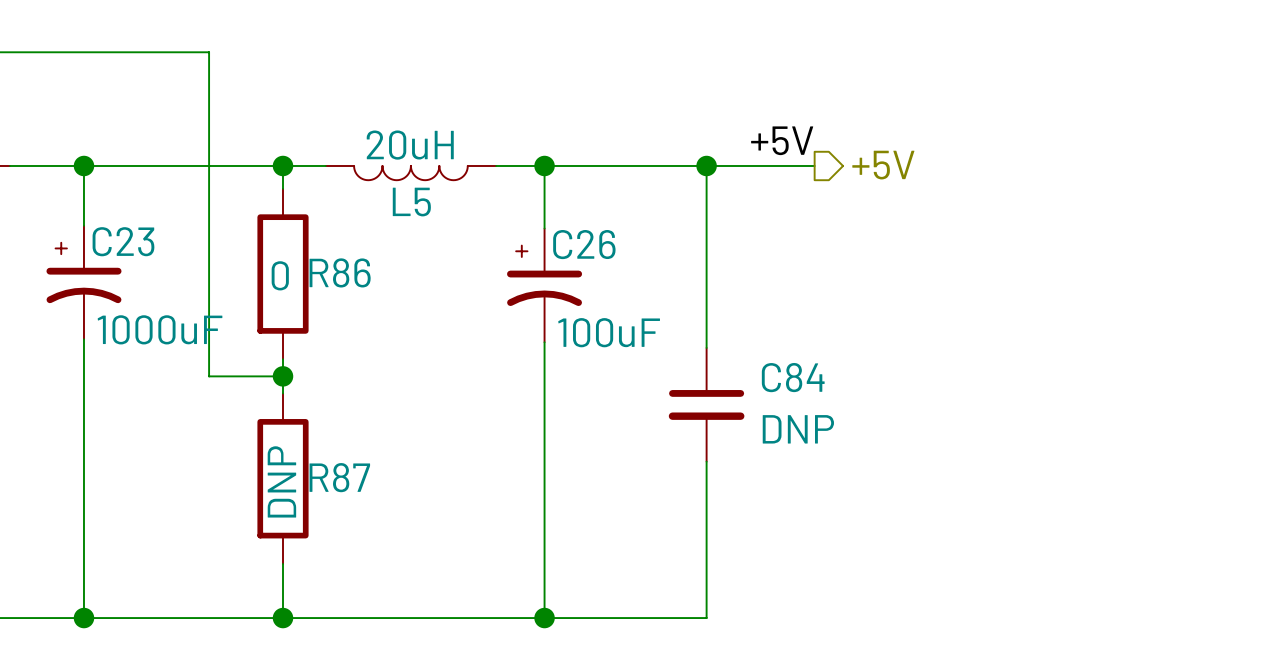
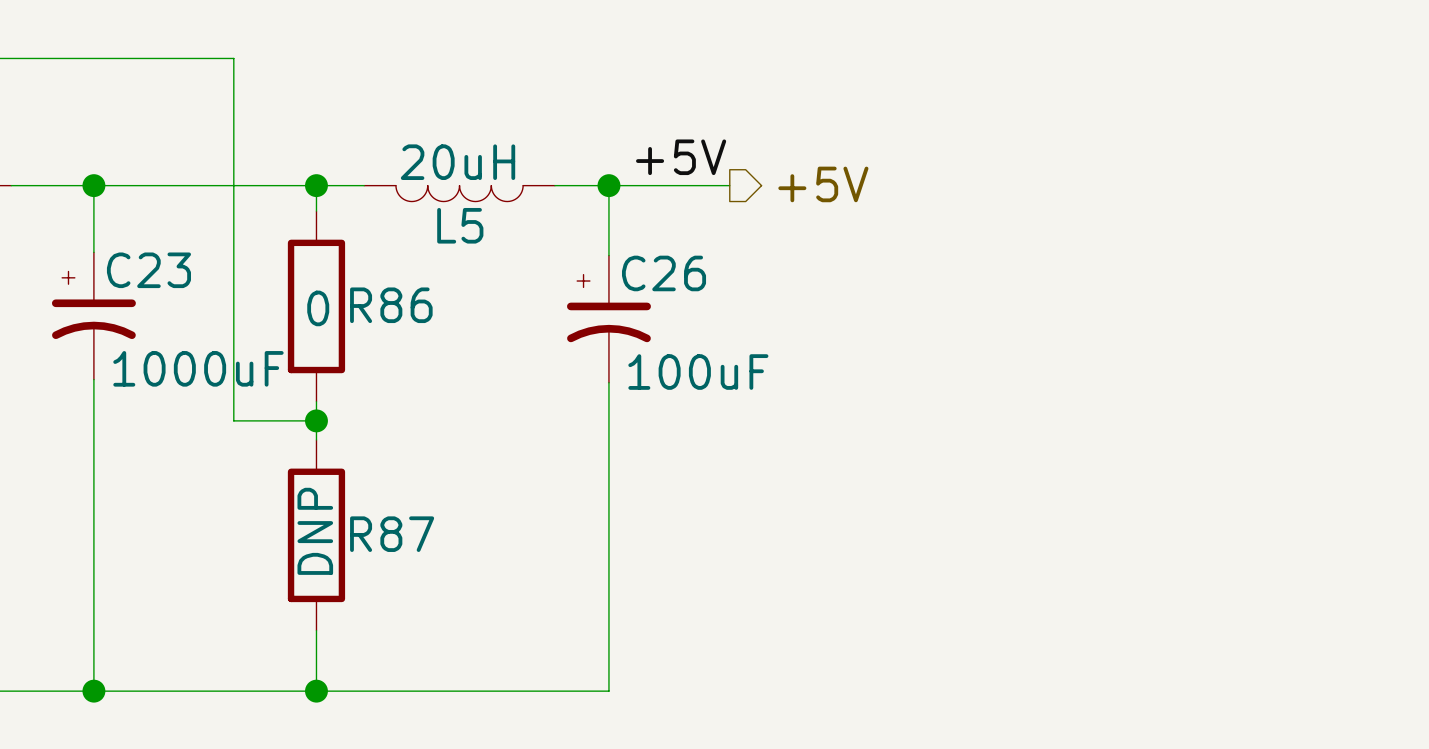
label position: +5V (782, 140) -> +5V (681, 157)
wire: (652, 165) (814, 165) -> none
wire: (706, 165) (706, 347) -> none
junction: (706, 165) -> none
hierarchical label position: +5V (883, 165) -> +5V (823, 184)
C84: DNP (706, 404) -> none
wire: (706, 461) (706, 618) (544, 618) -> none
junction: (544, 618) -> none

